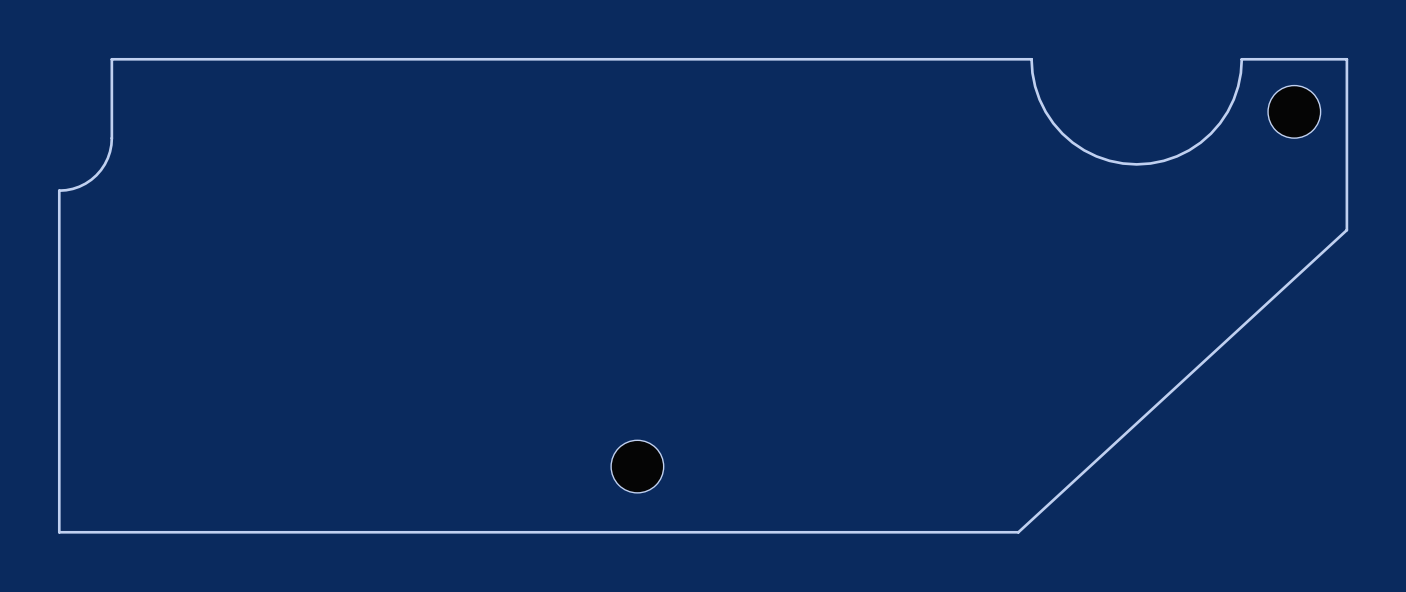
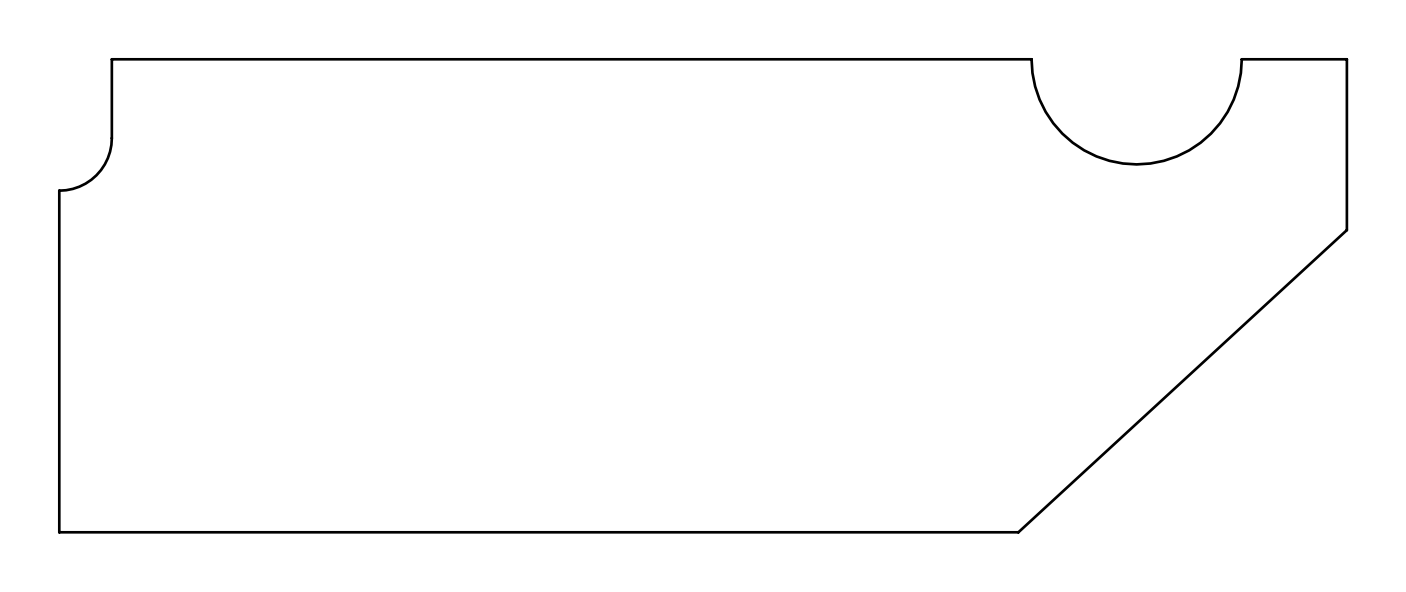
hole: (1294, 111) -> none
hole: (637, 466) -> none

